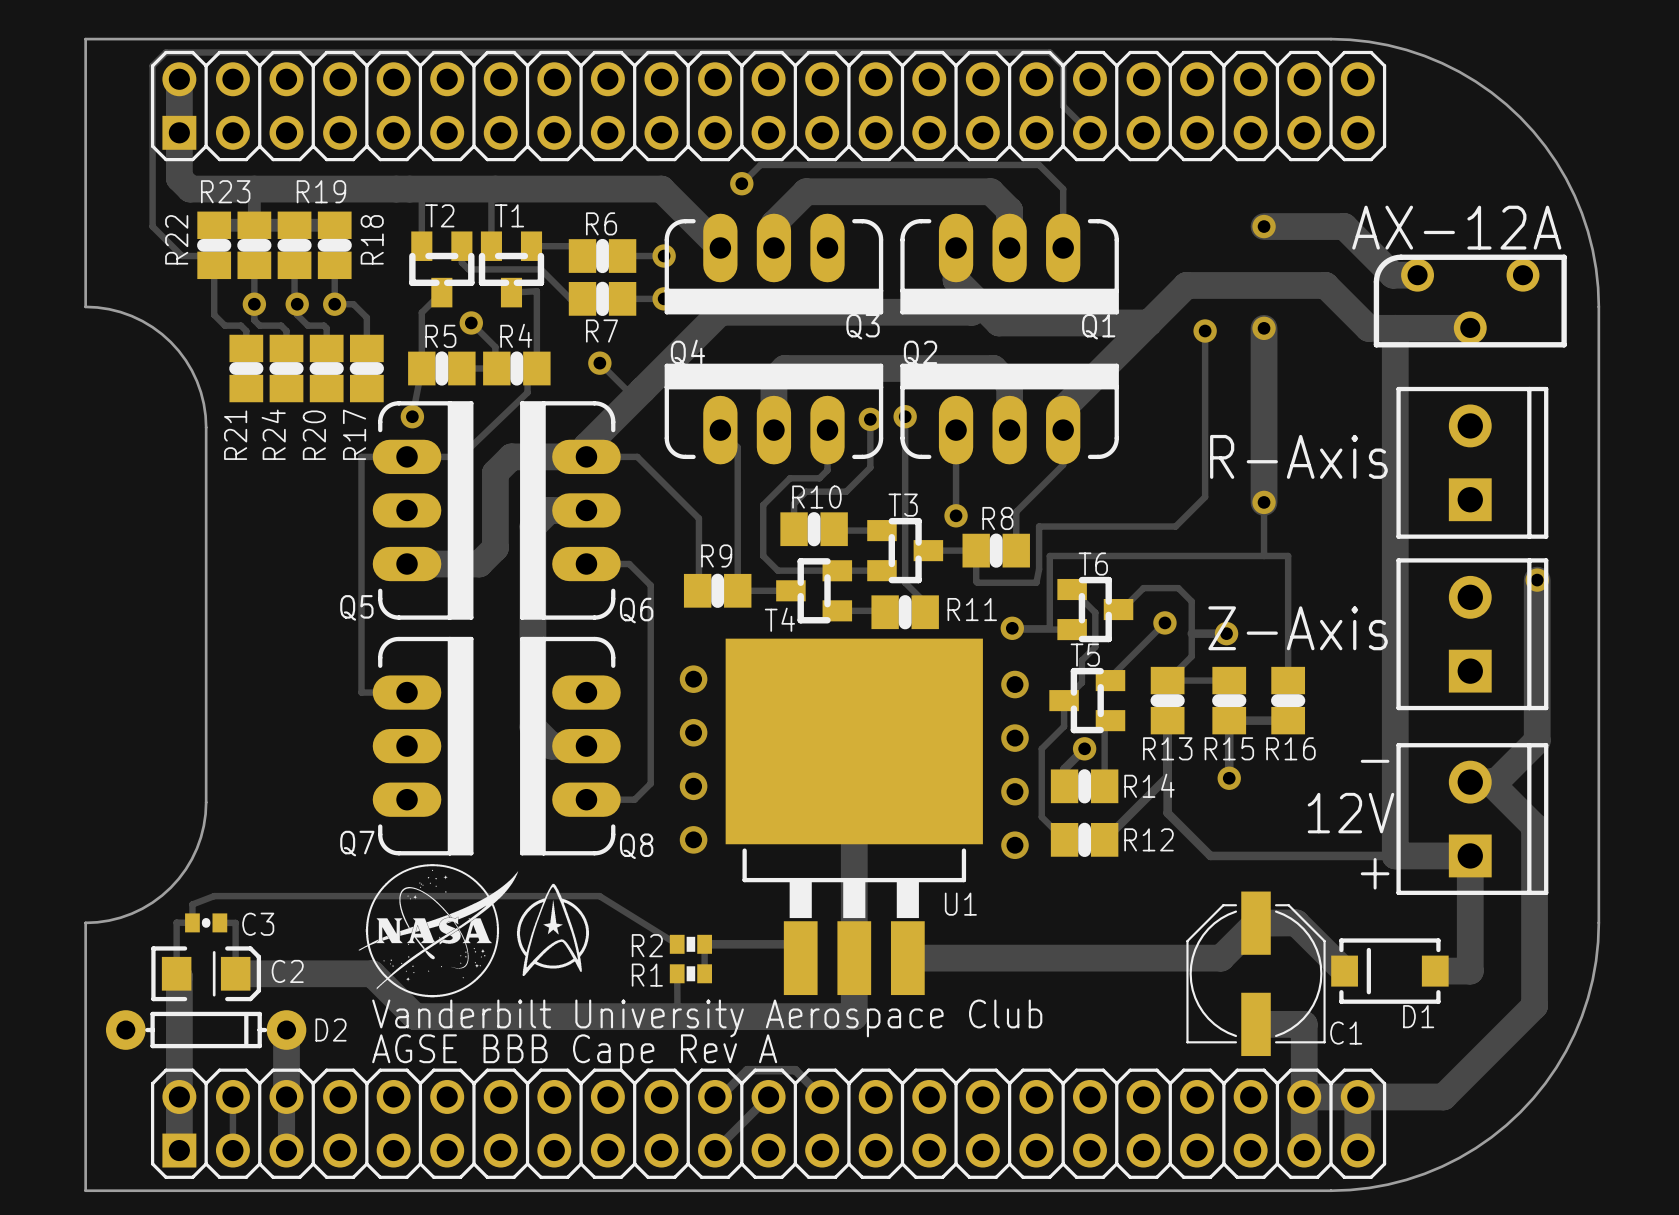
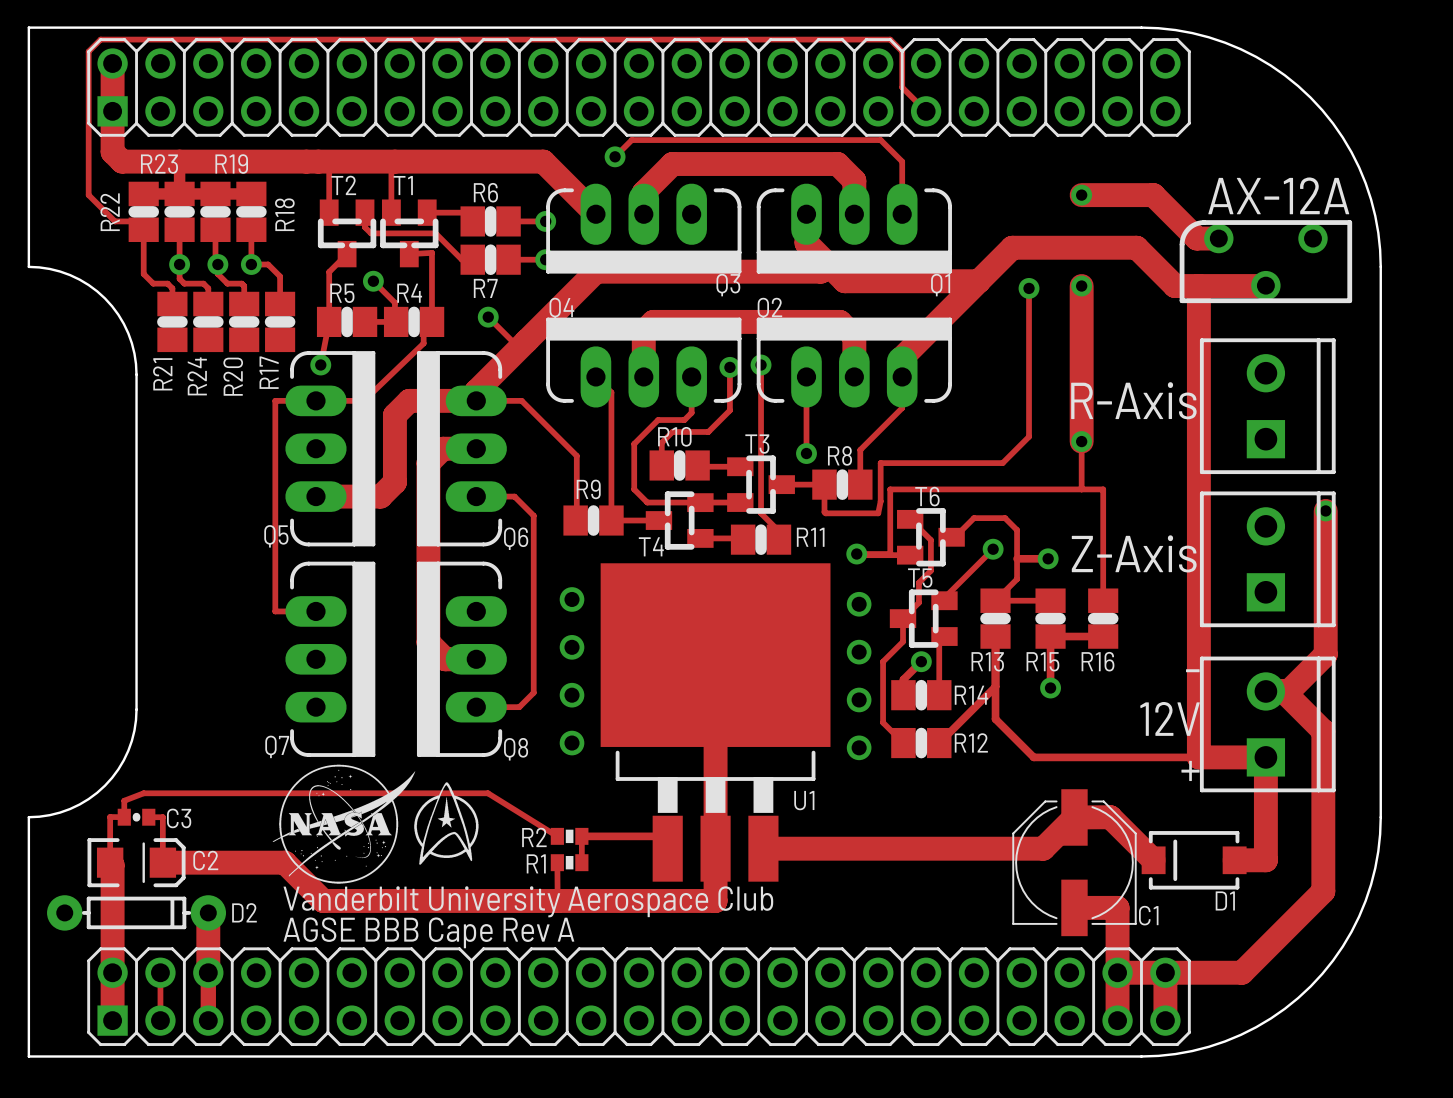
track: (715, 1096) (720, 1096) (747, 1070) (795, 1070) (822, 1096) -> none
track: (768, 1096) (715, 1150) -> none

